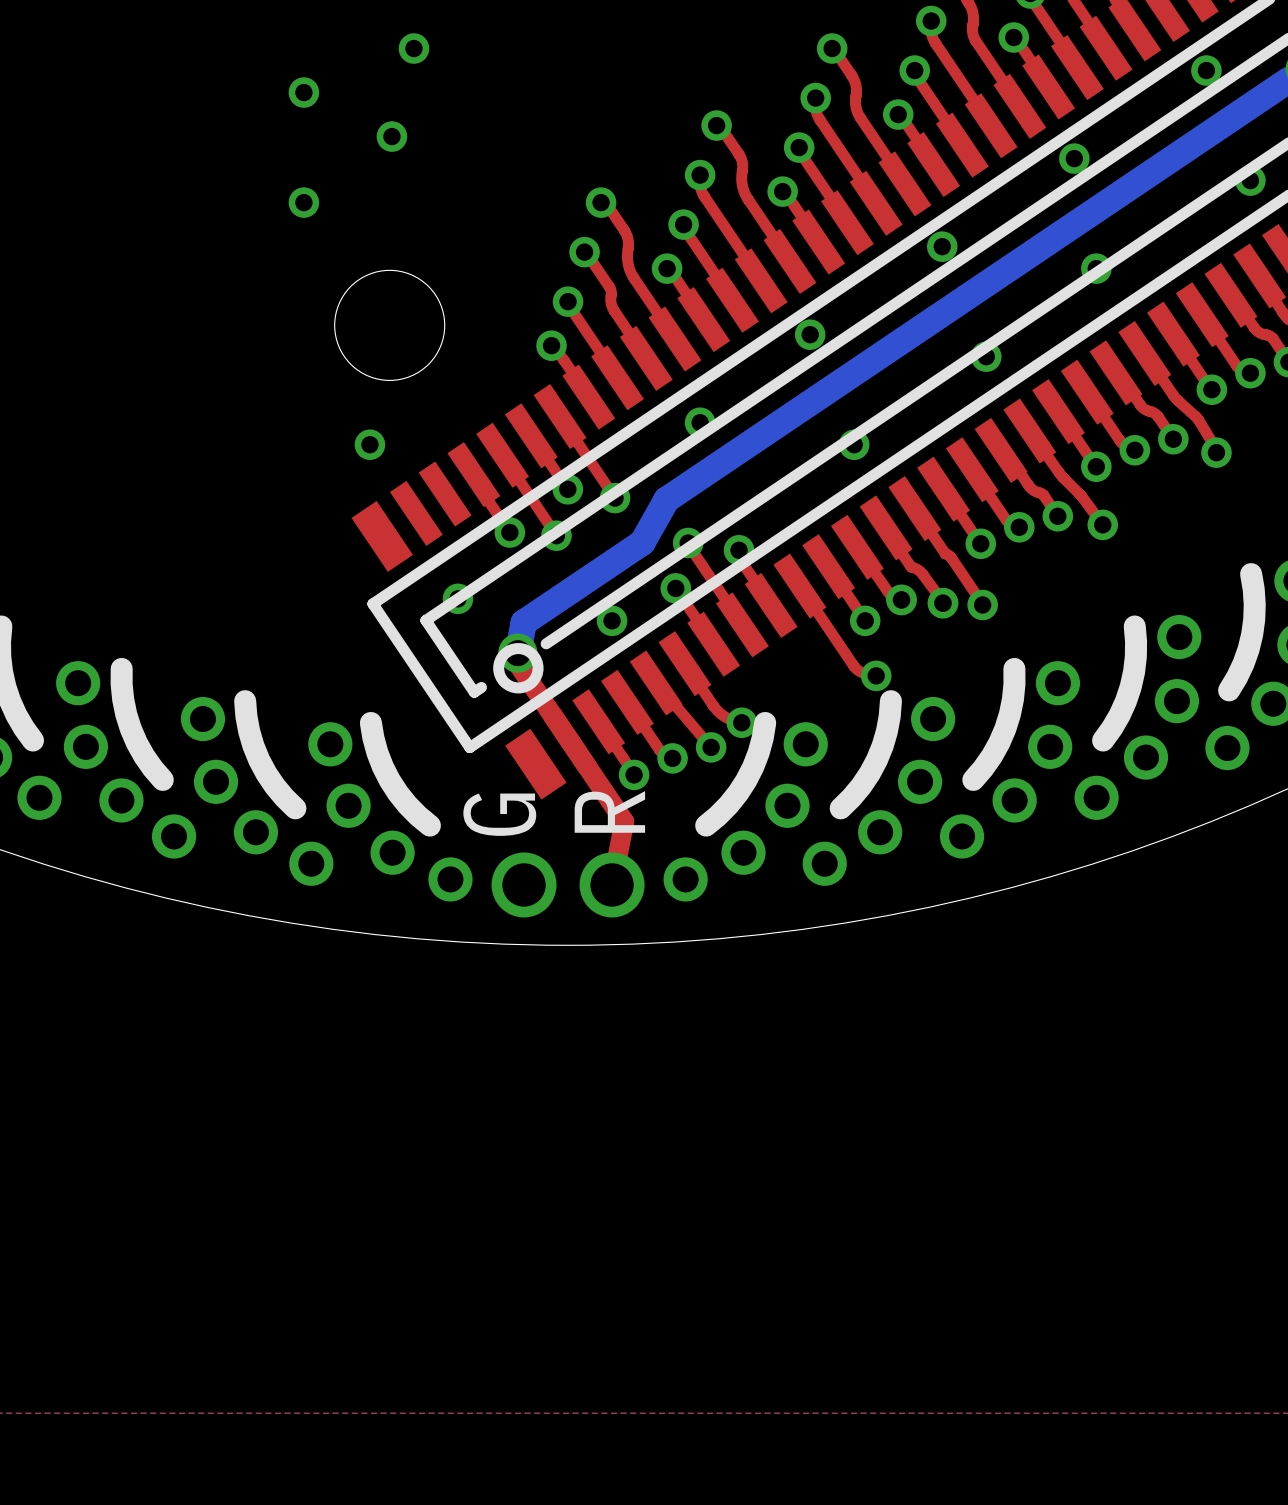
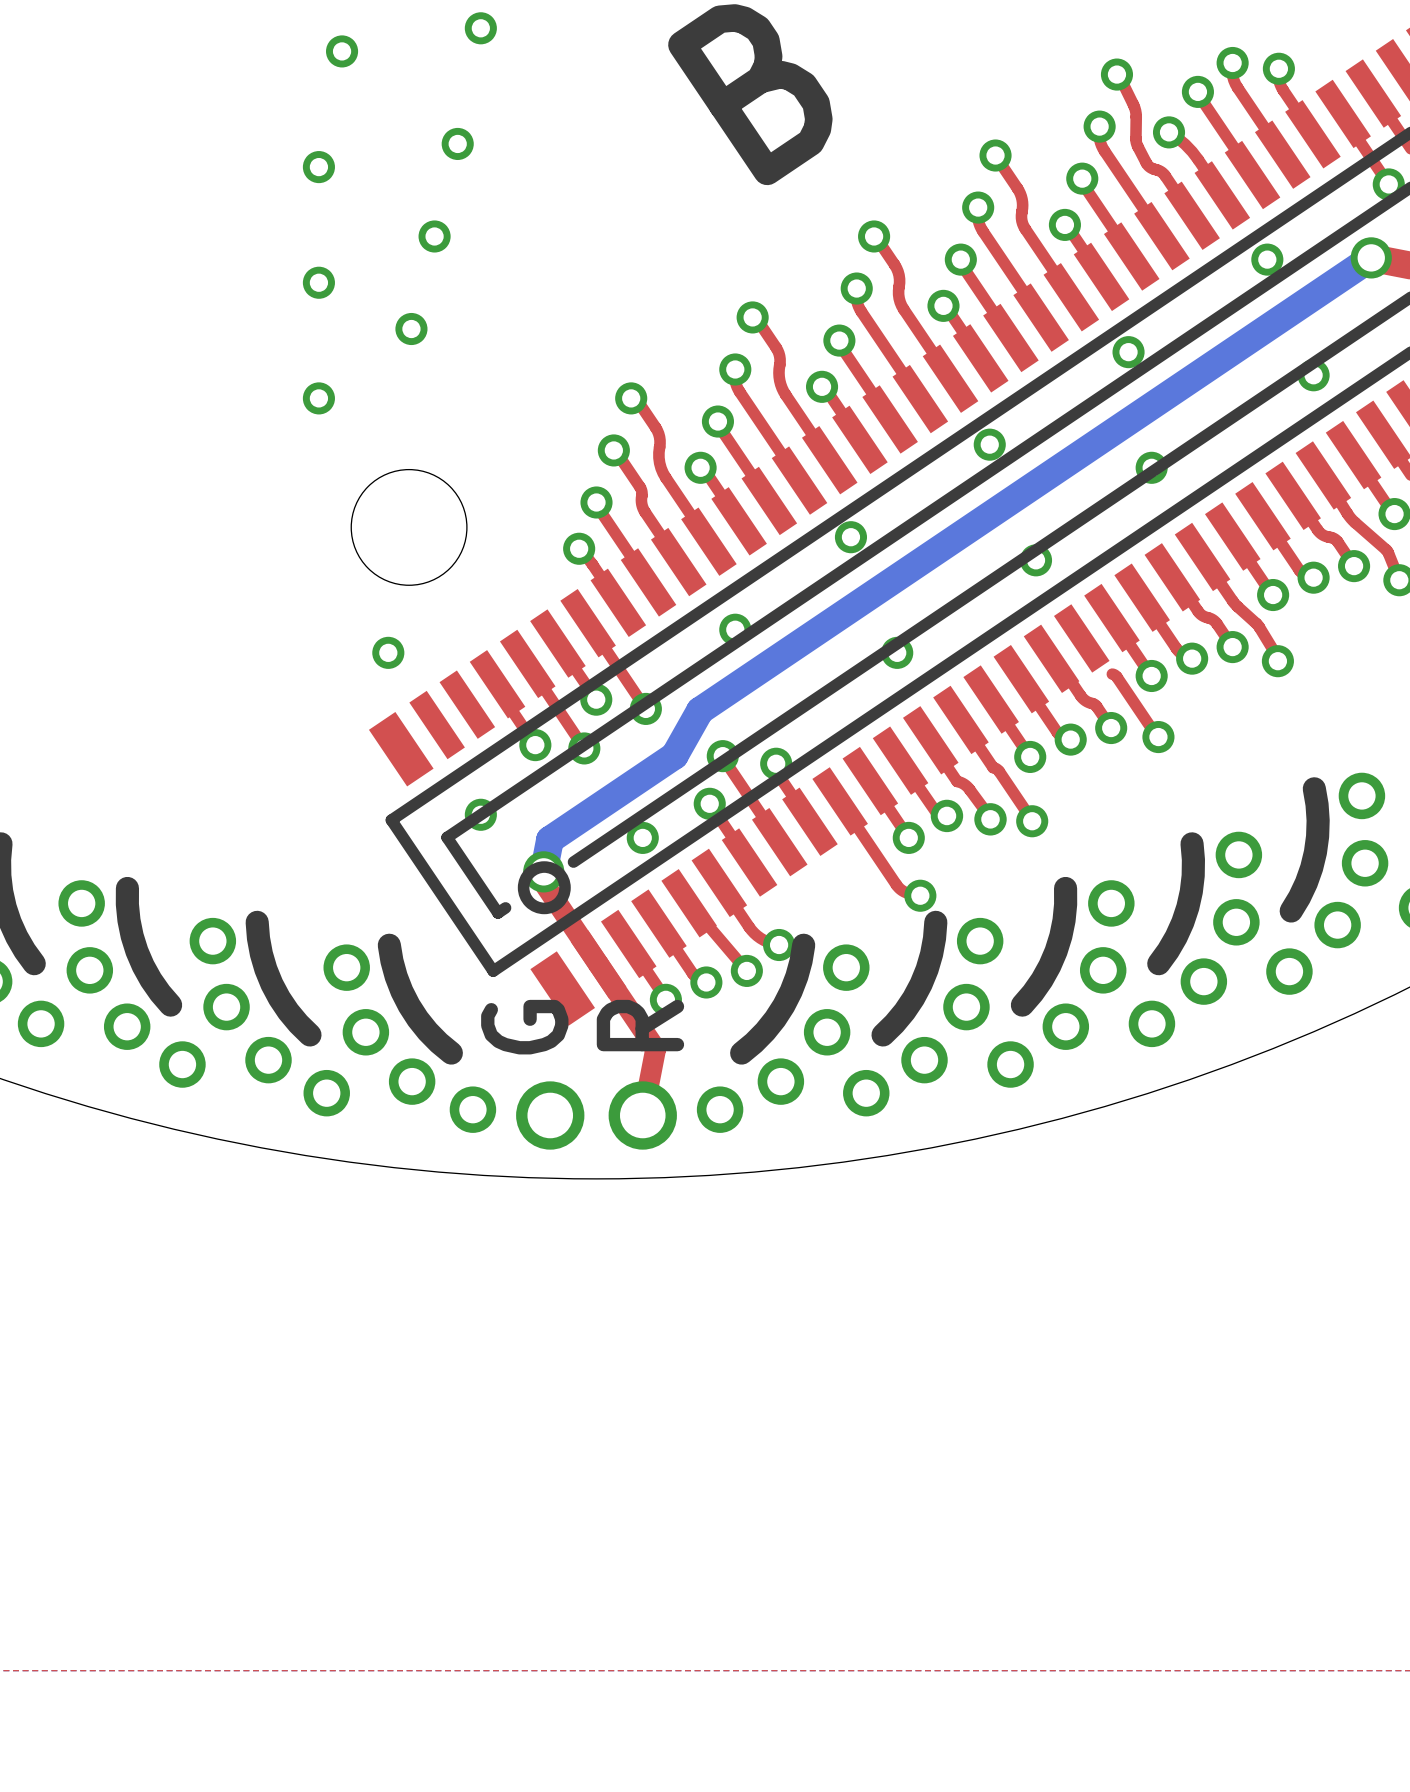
top track: (1029, 431) (1061, 475) (1080, 495) (1102, 524) -> (1112, 674) (1116, 677) (1158, 737)

